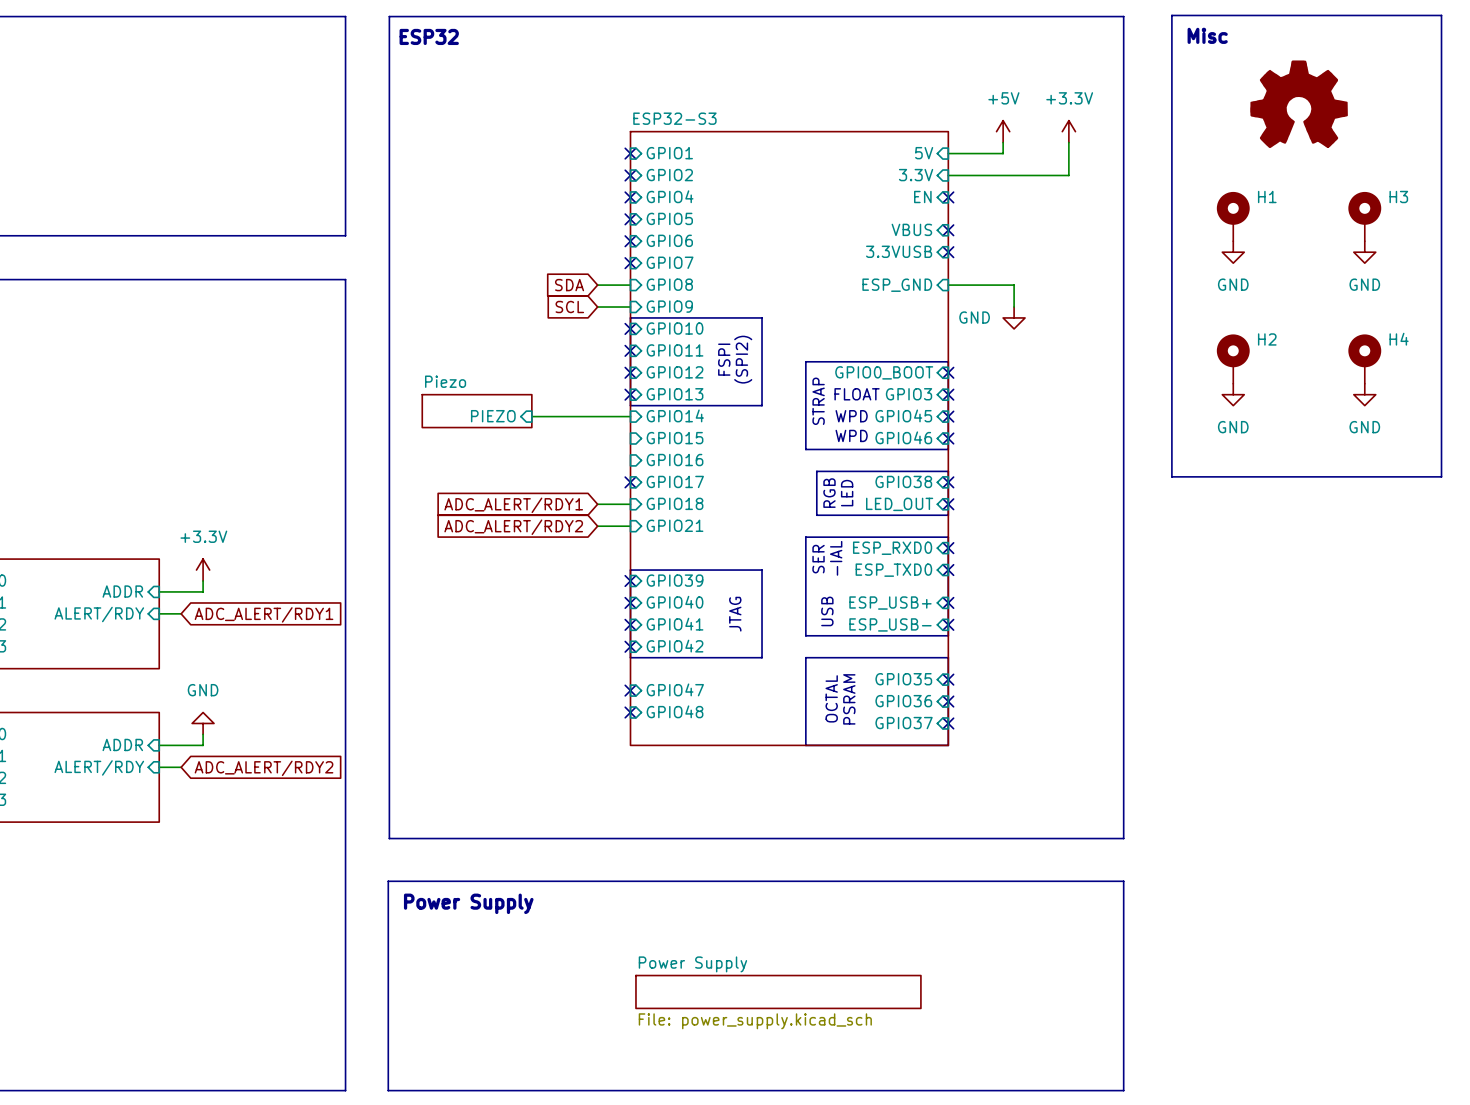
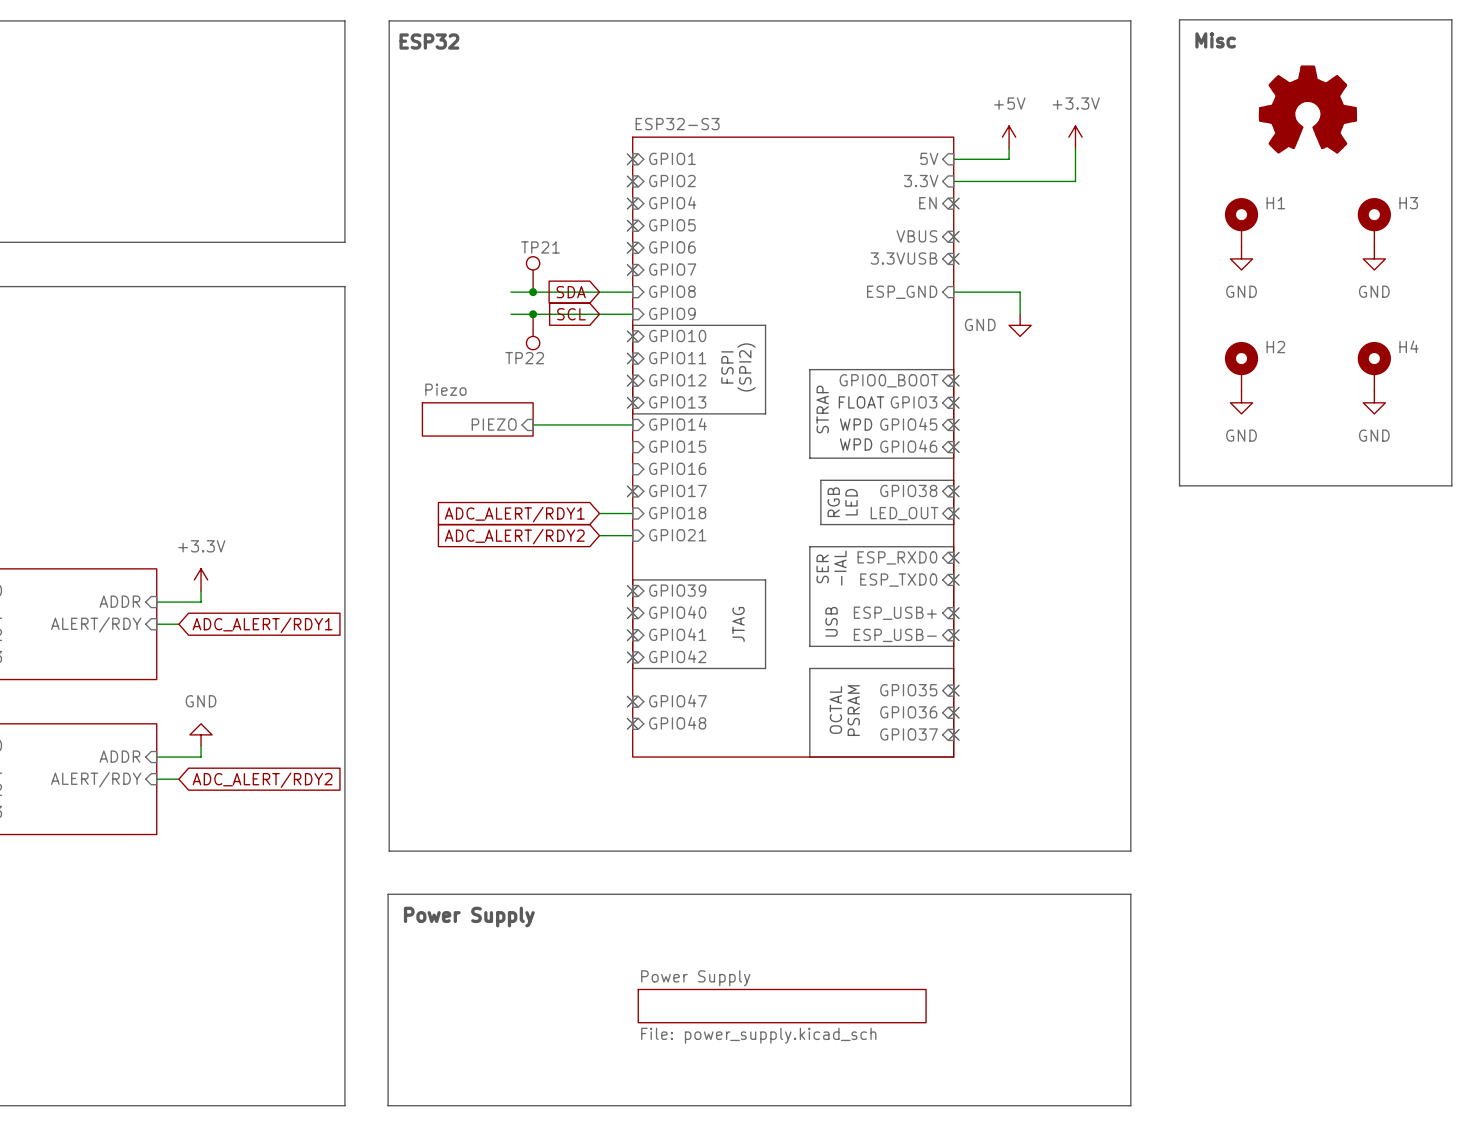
TP21: none -> (533, 274)
wire: none -> (510, 292) (599, 292)
junction: none -> (533, 292)
wire: none -> (510, 314) (599, 314)
junction: none -> (533, 314)
TP22: none -> (533, 331)

